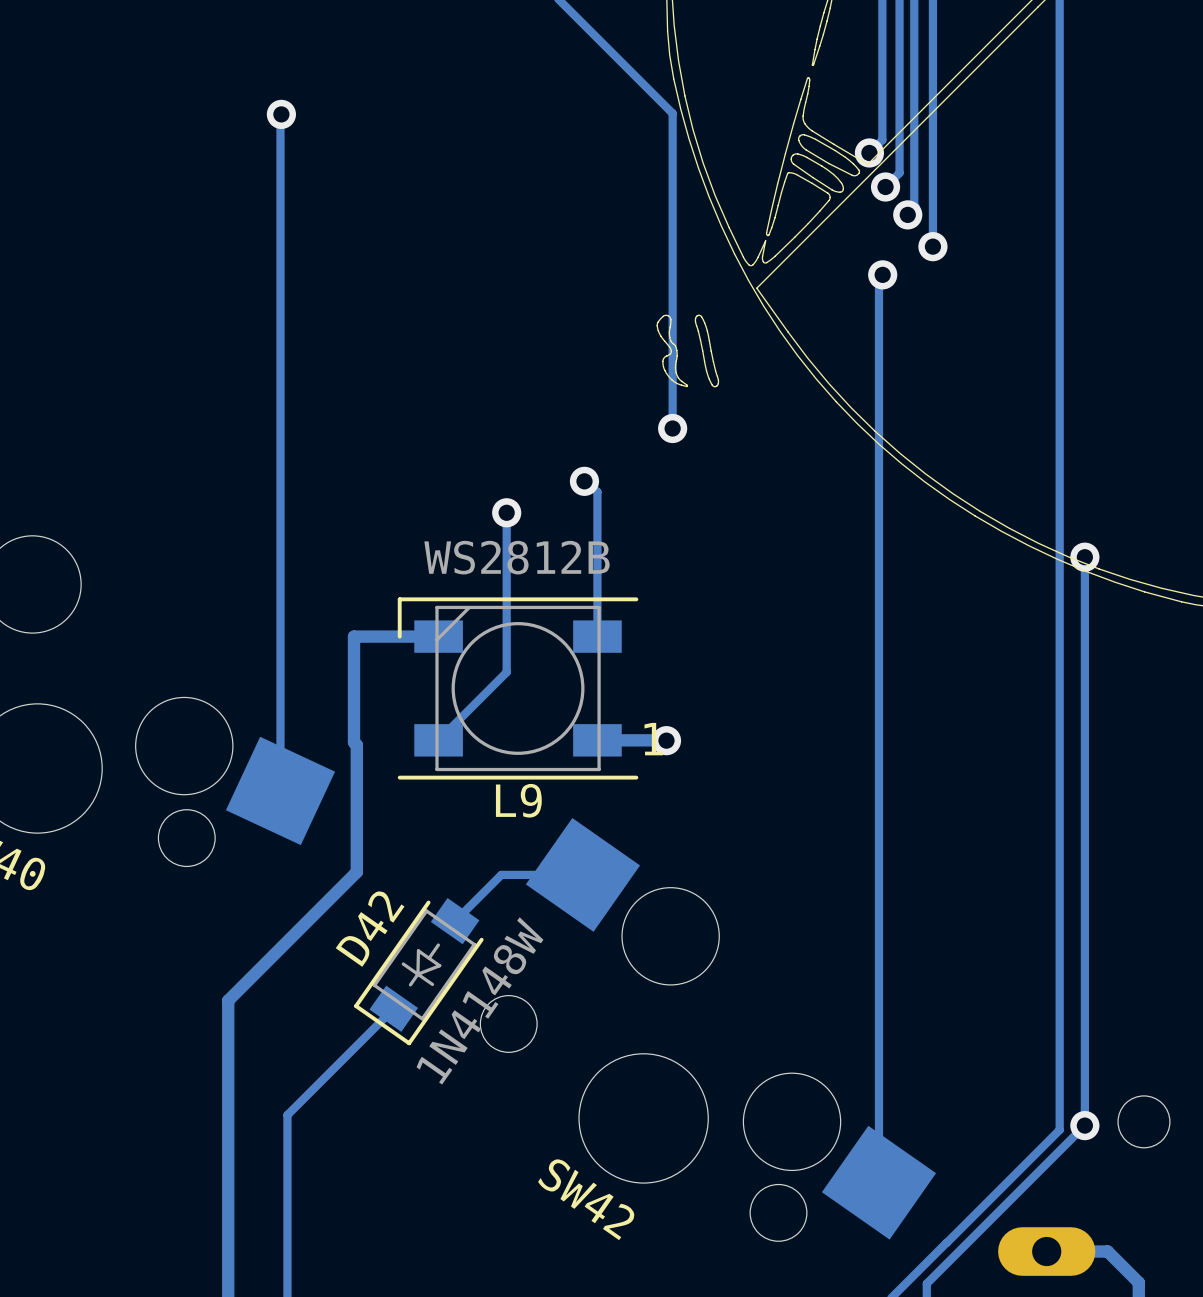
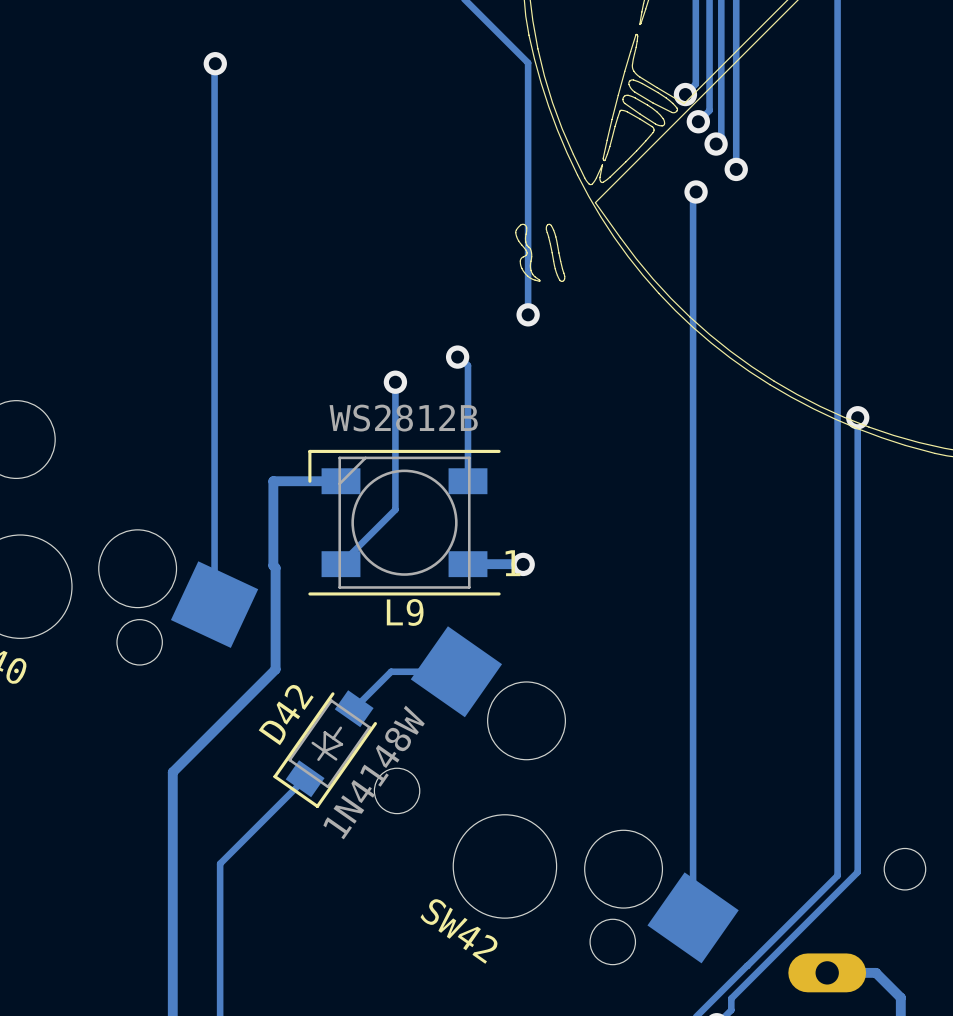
via: (1084, 1125) -> none

